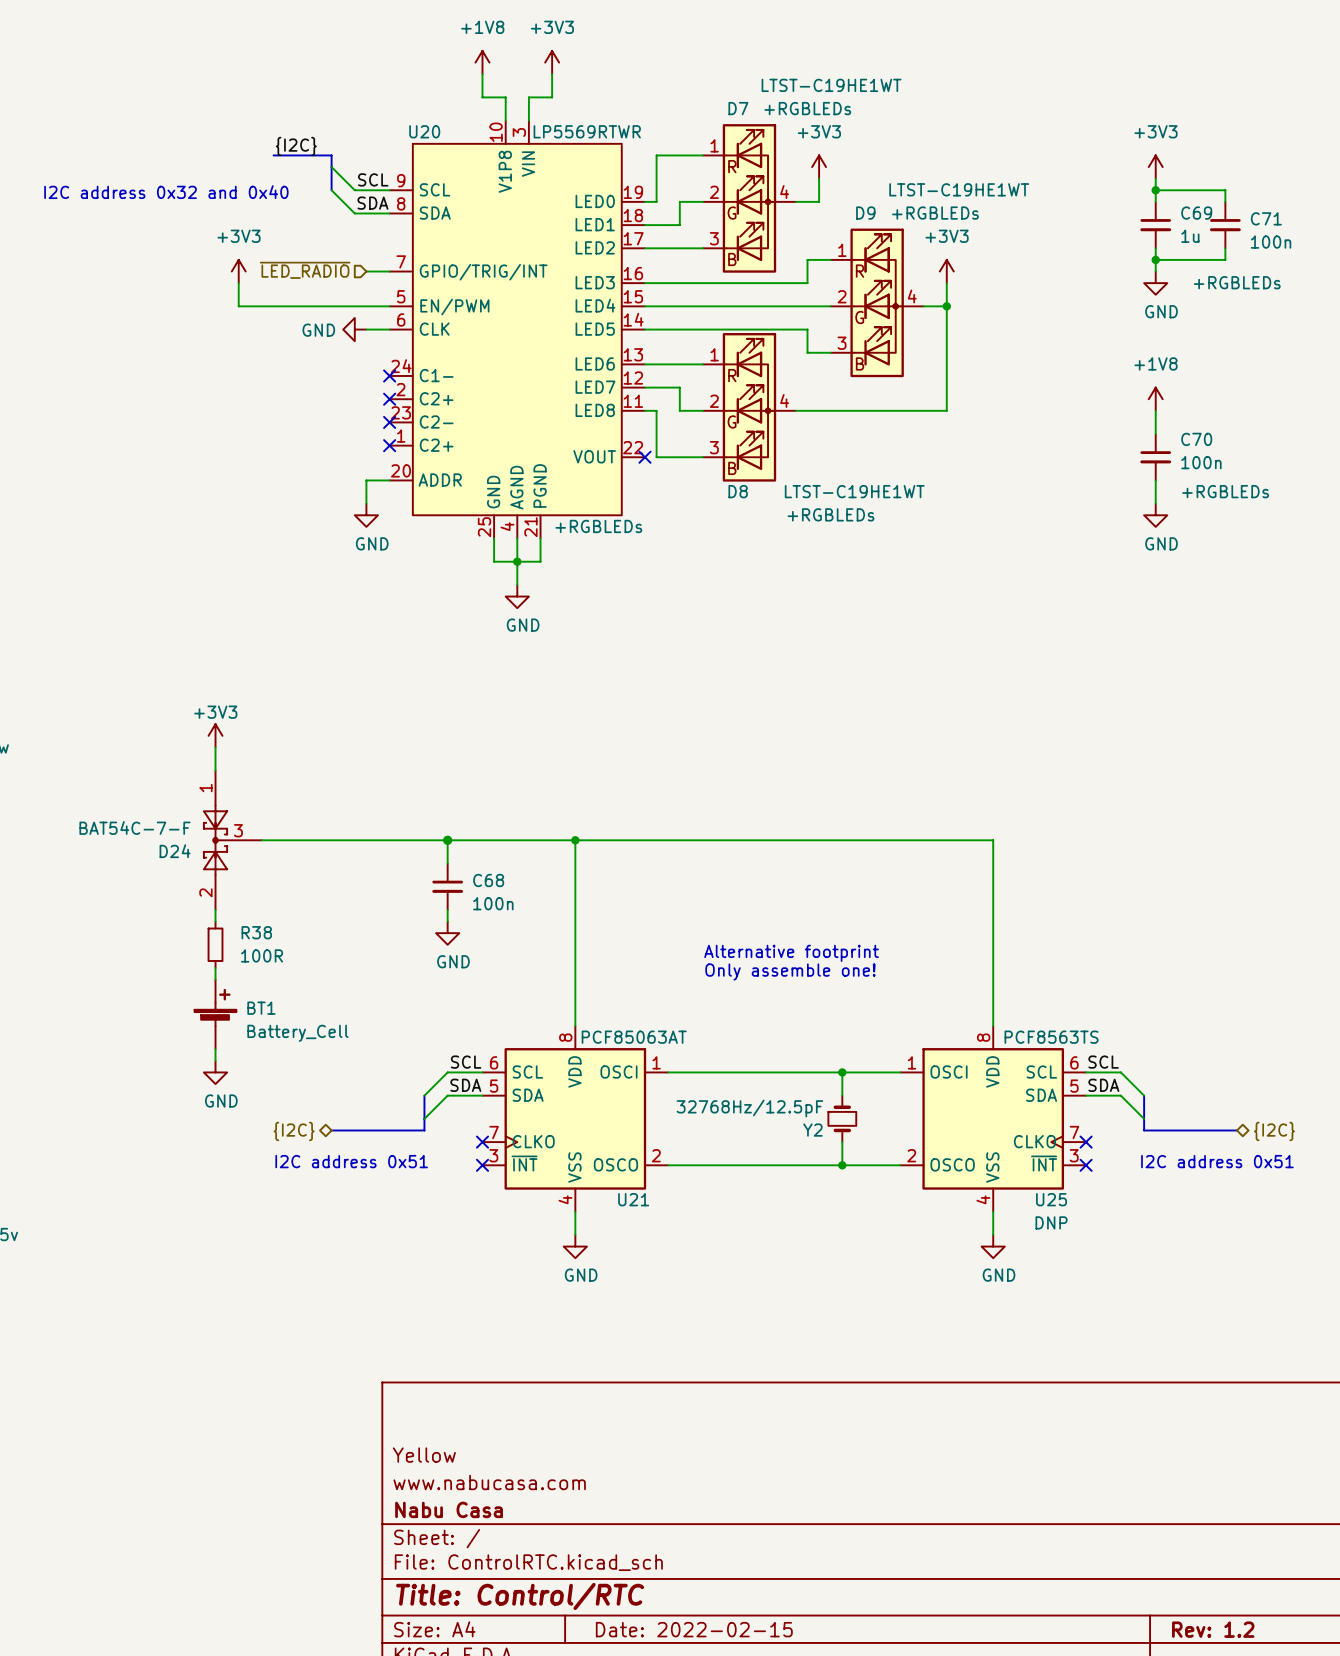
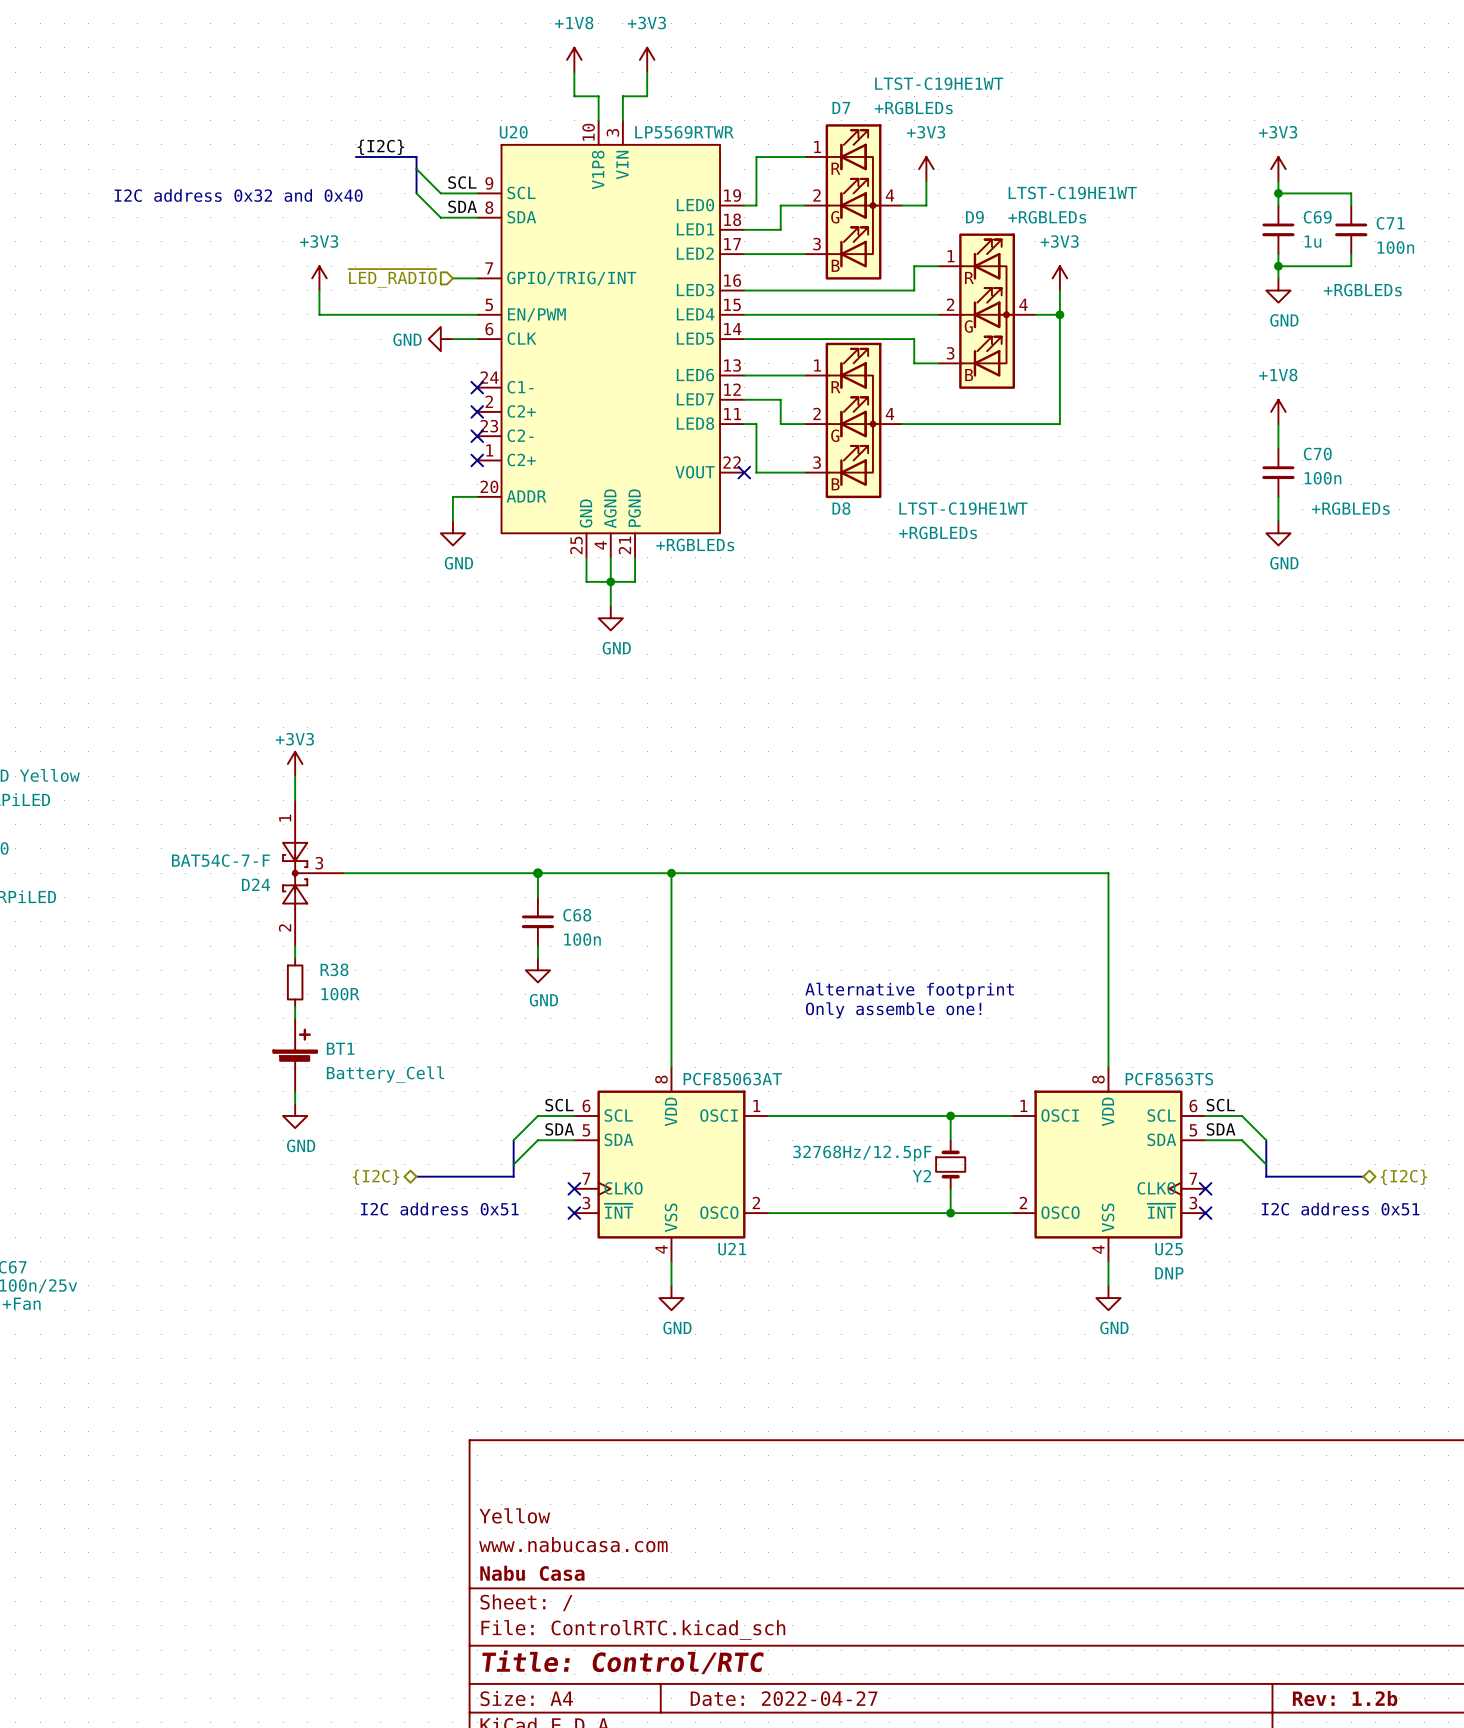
title block: Date: 2022-02-15 (694, 1629) -> Date: 2022-04-27 (784, 1698)
title block: Rev: 1.2 (1213, 1629) -> Rev: 1.2b (1345, 1698)

